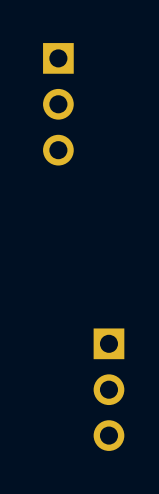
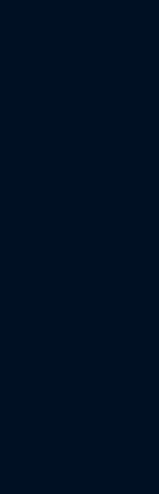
part: (58, 104) -> none
part: (108, 389) -> none

